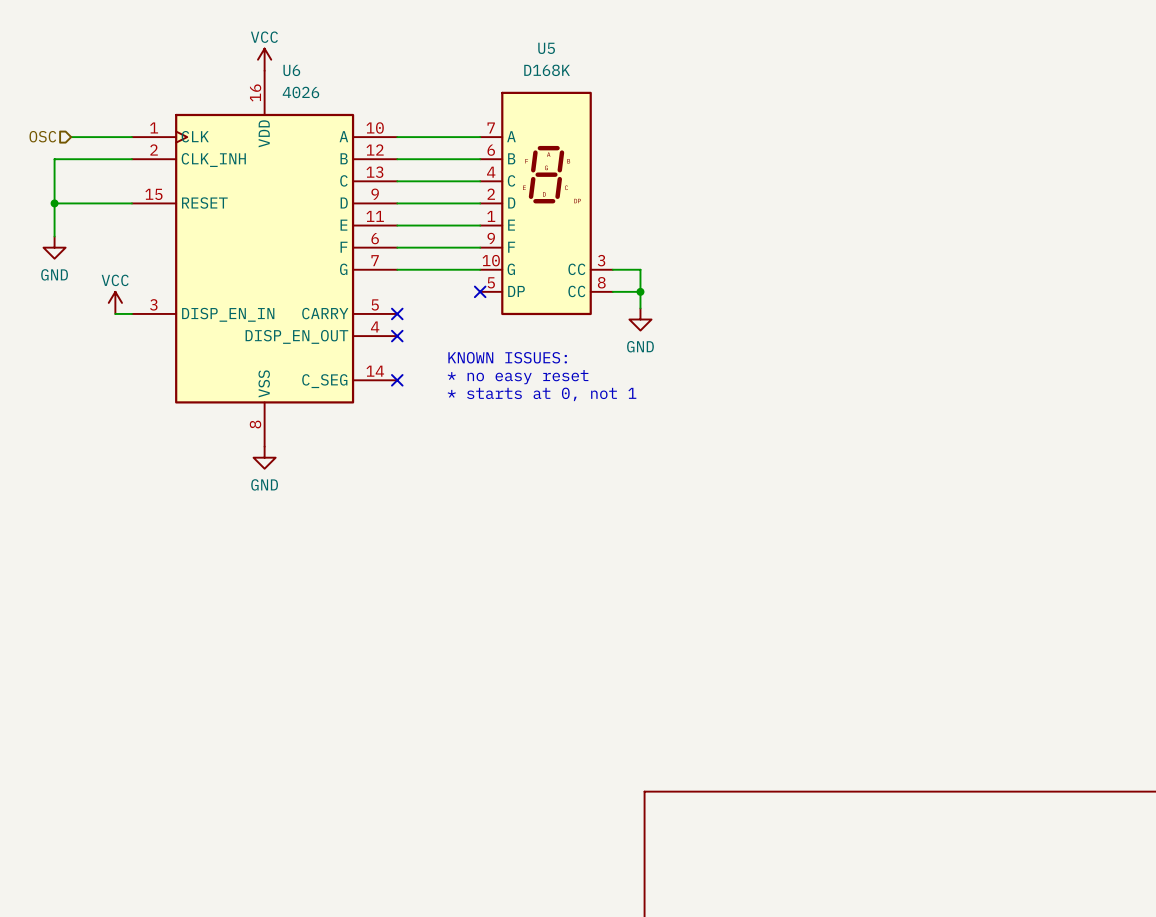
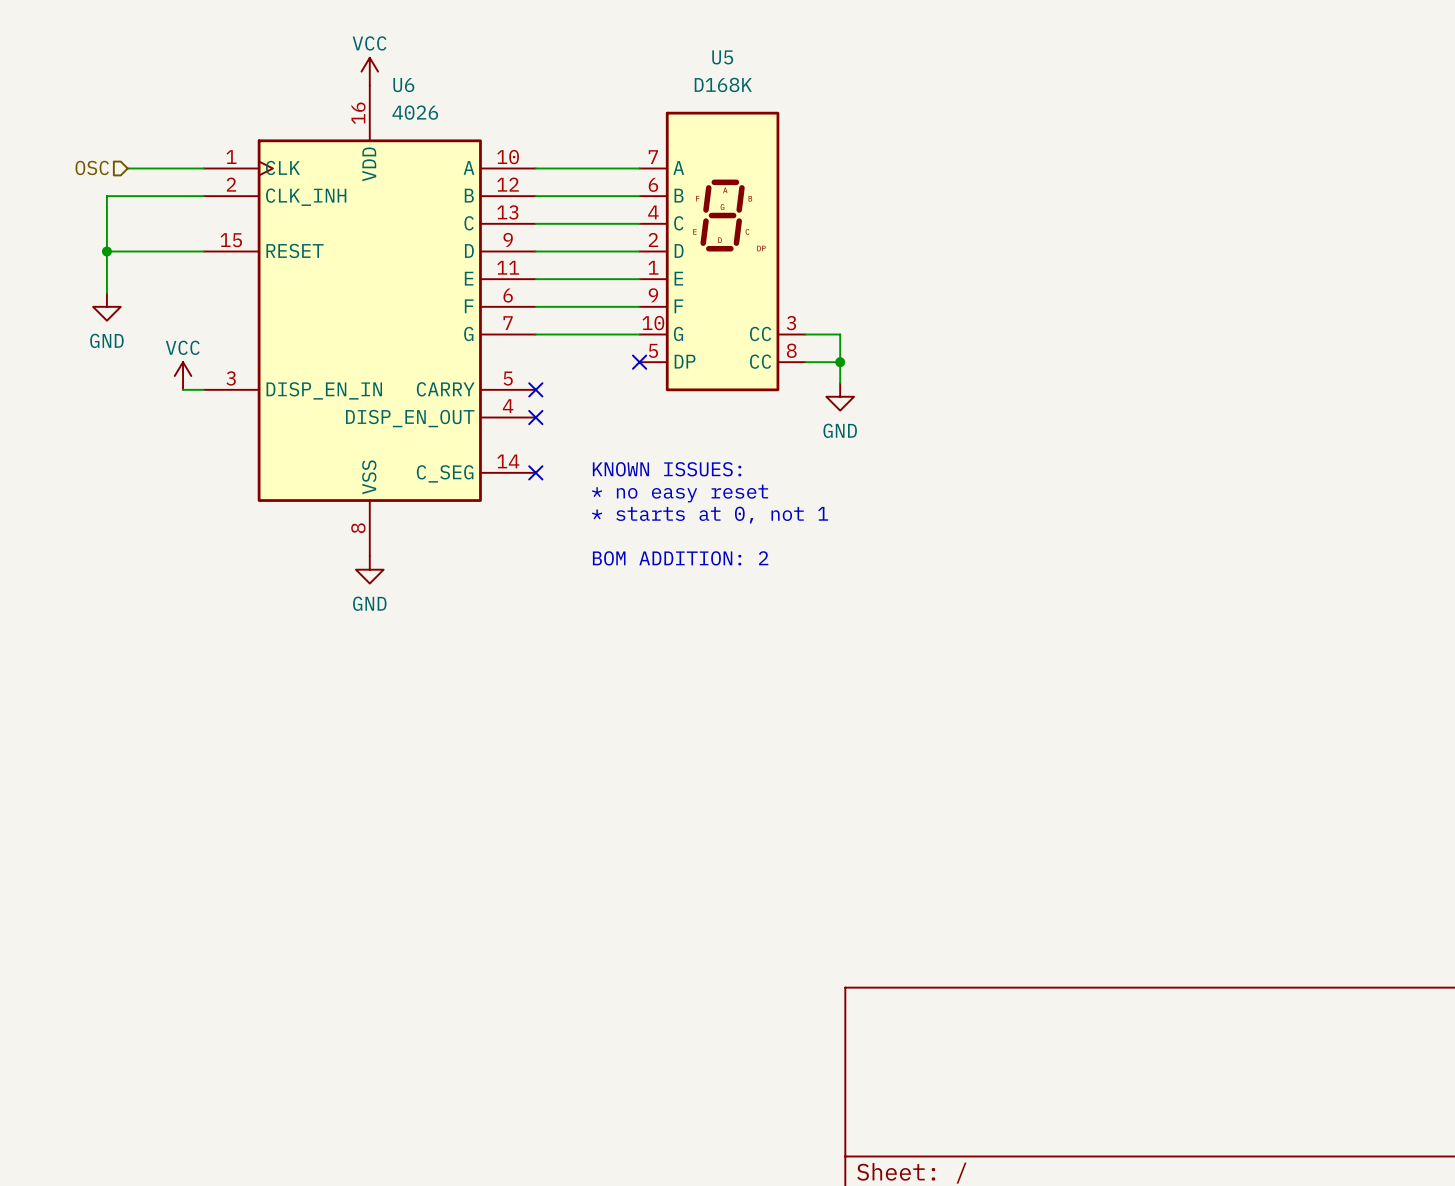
text: KNOWN ISSUES: (507, 357) -> none
text: * no easy reset (518, 377) -> KNOWN ISSUES: (667, 469)
text: * starts at 0, not 1 (542, 394) -> * no easy reset (680, 493)
text: none -> * starts at 0, not 1 (710, 515)
text: none -> BOM ADDITION: 2 (680, 558)

